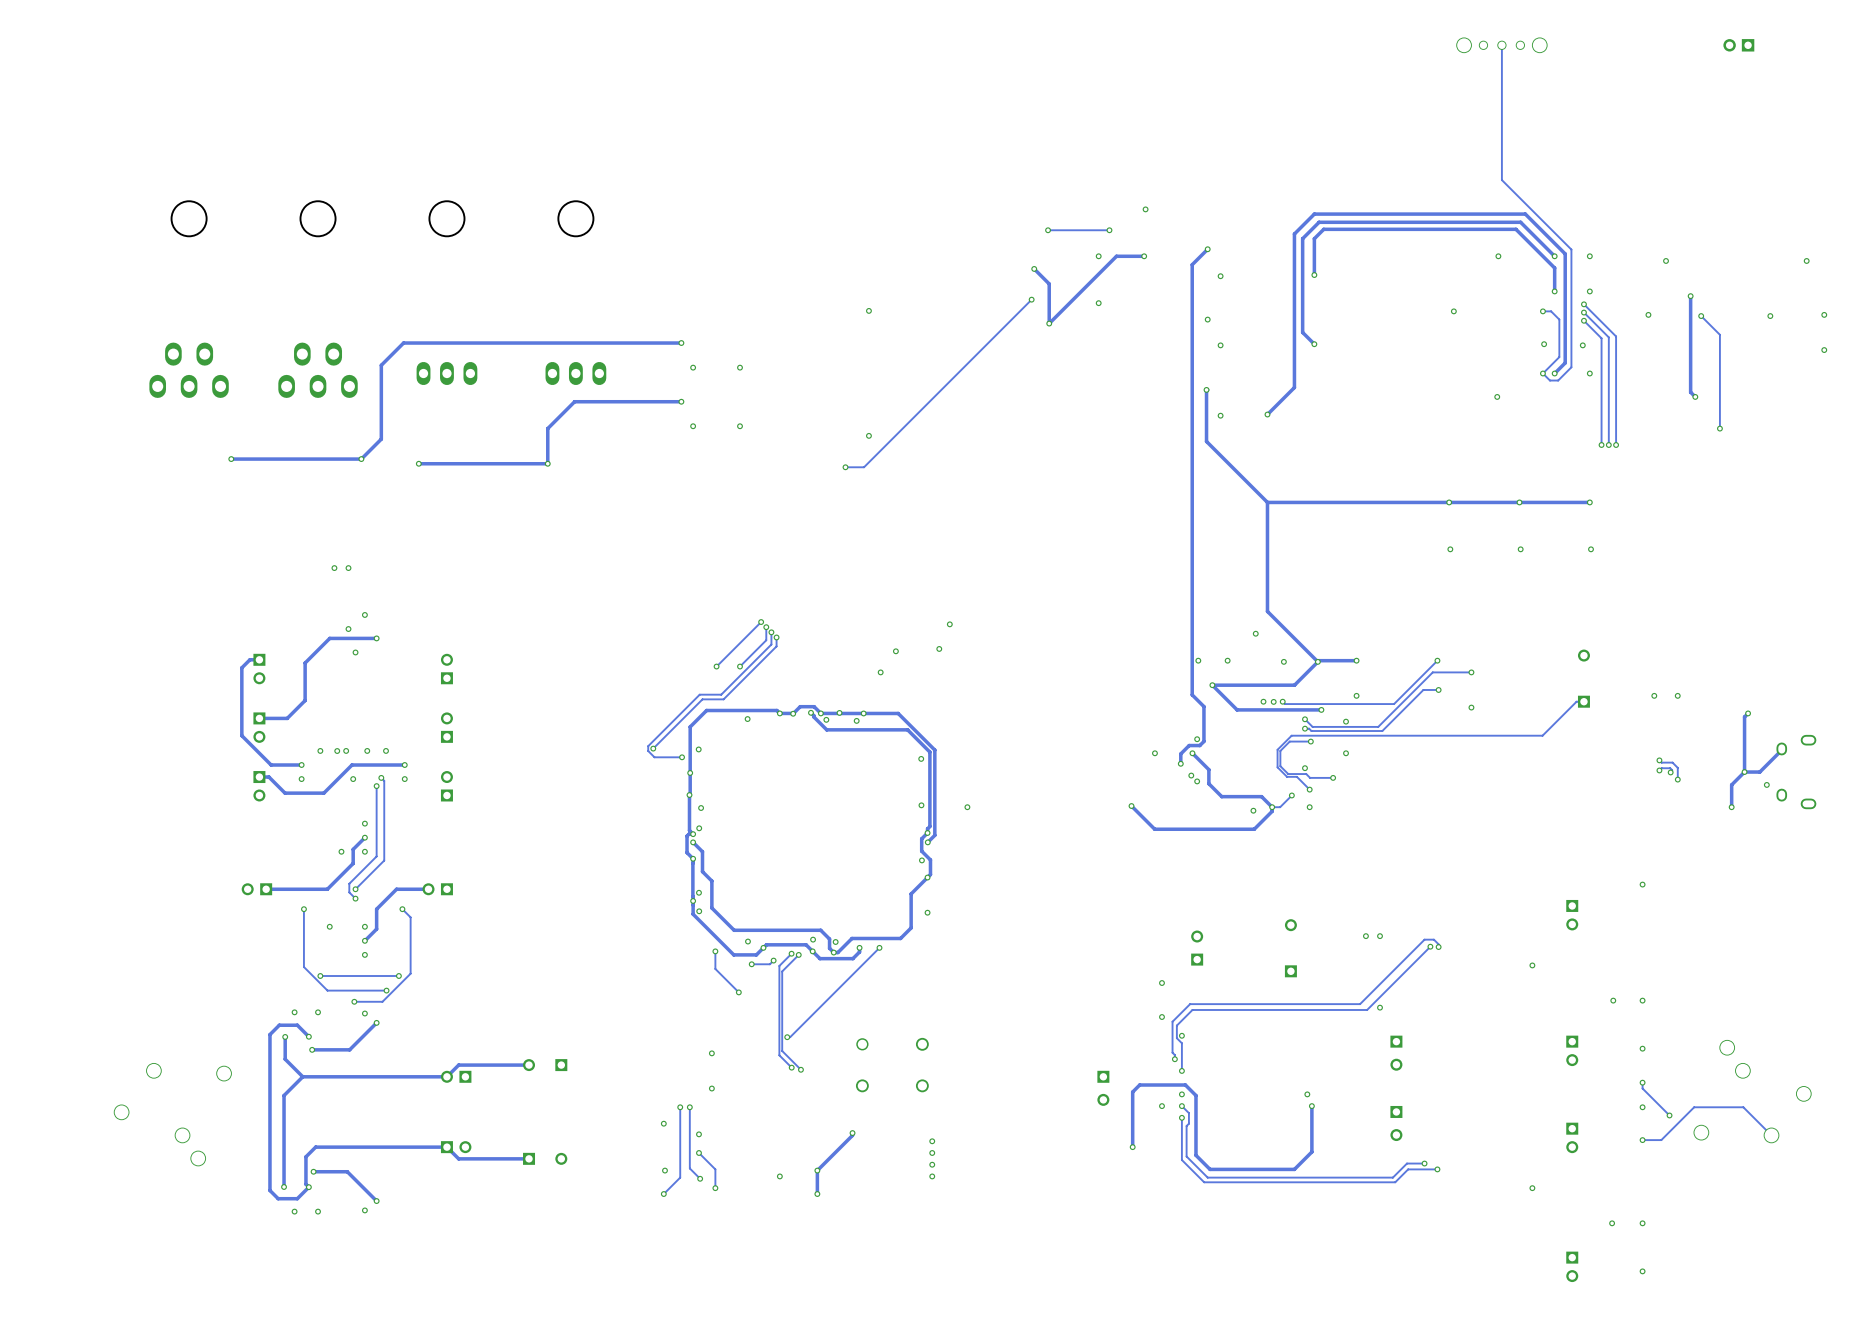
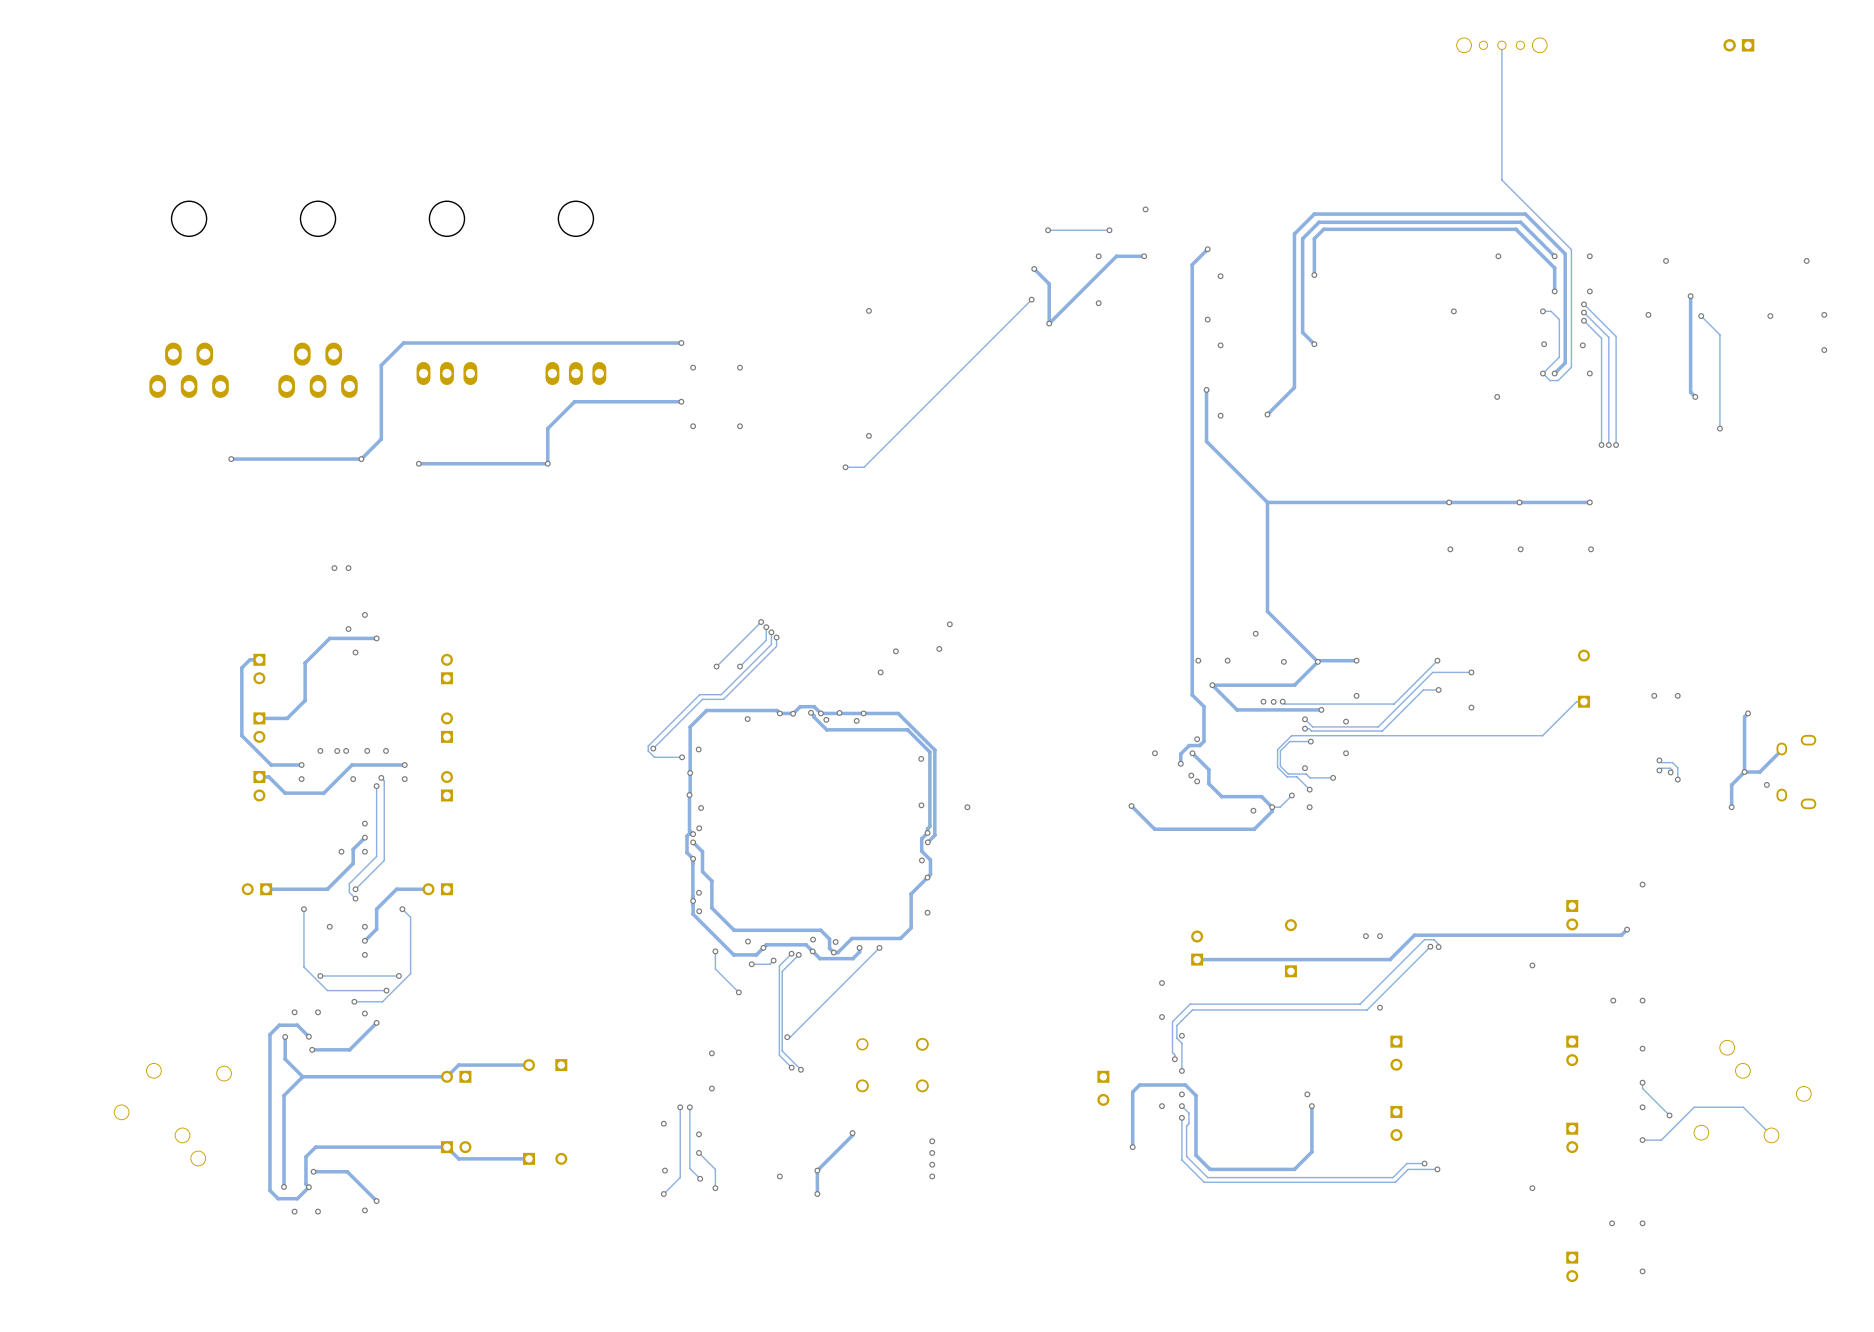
track: none -> (1627, 929) (1621, 935) (1414, 935) (1390, 959) (1197, 959)
via: none -> (1627, 929)

